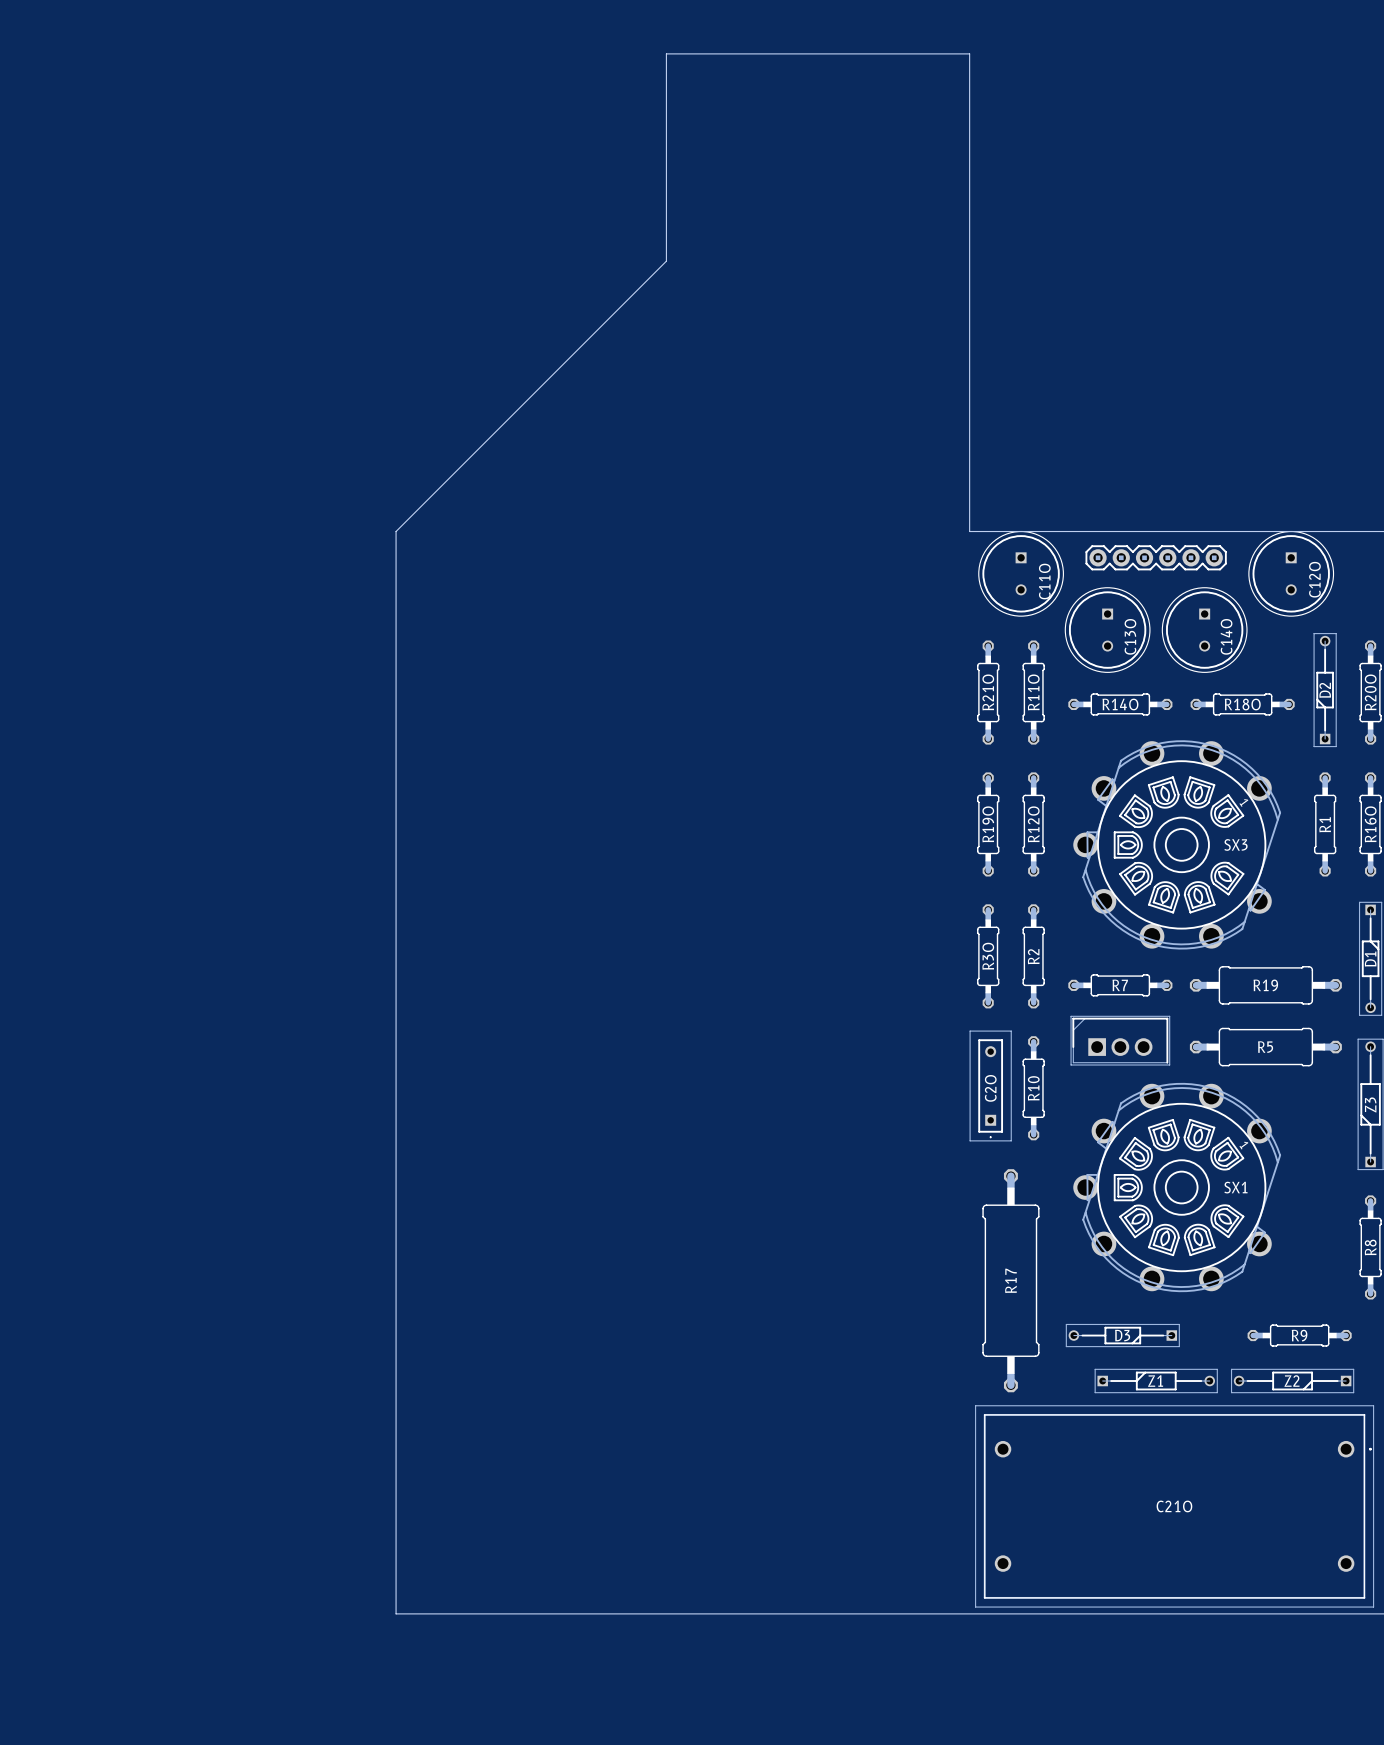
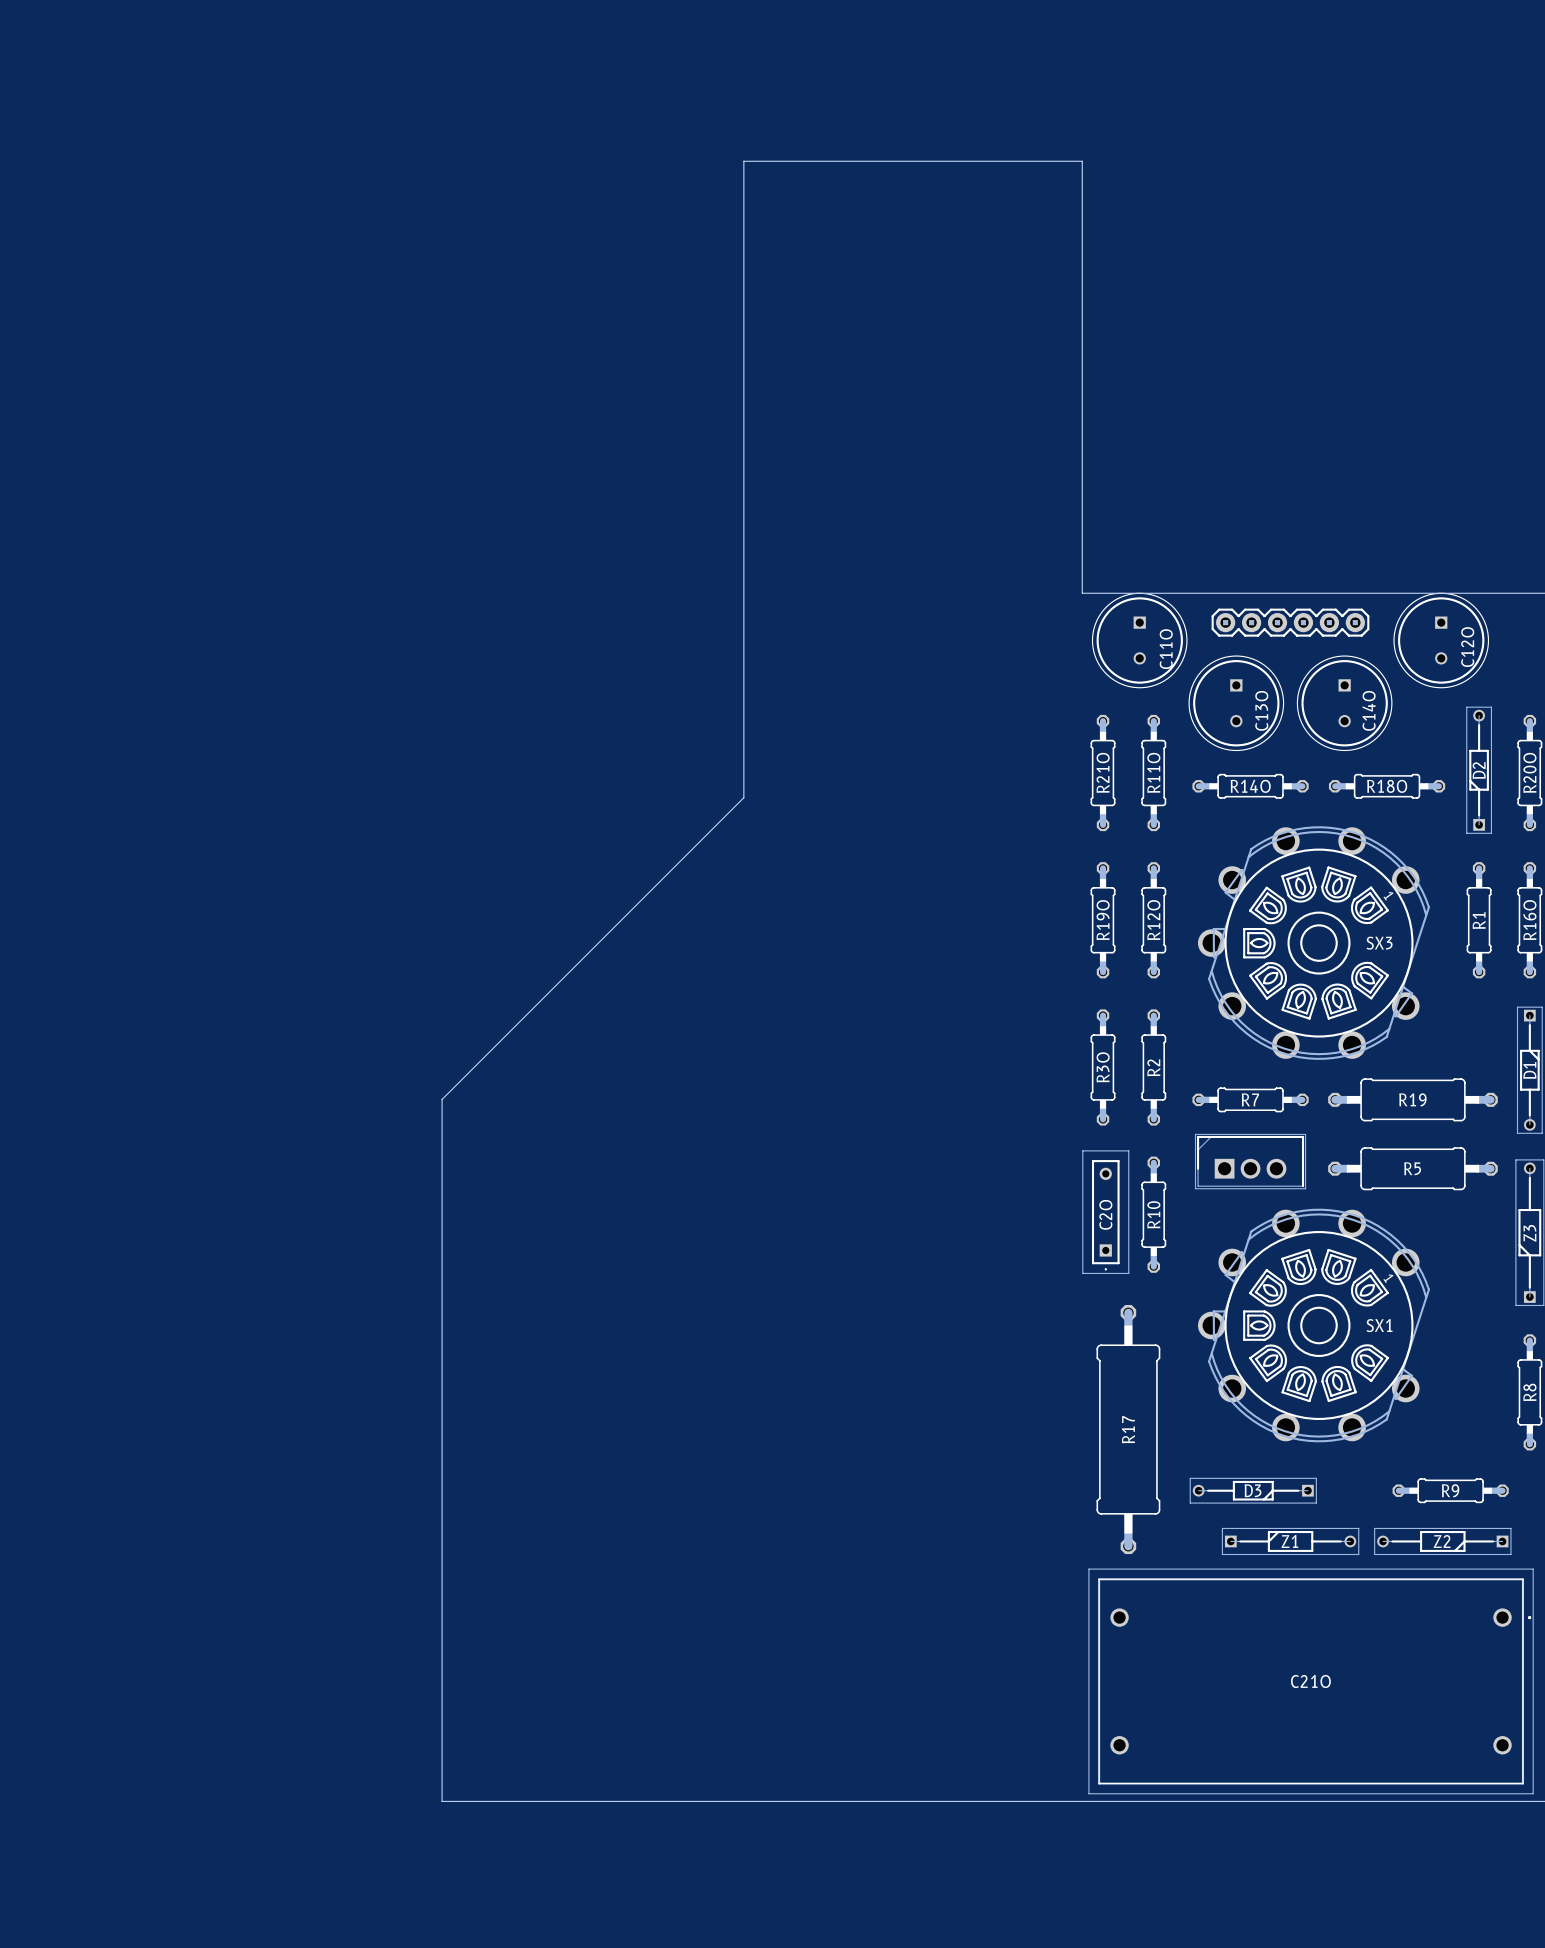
board edge: (666, 144) (666, 53) (969, 53) (969, 144) -> (743, 161) (1082, 161)
board edge: (666, 261) (396, 531) (396, 985) -> (743, 291) (743, 797) (442, 1099)

